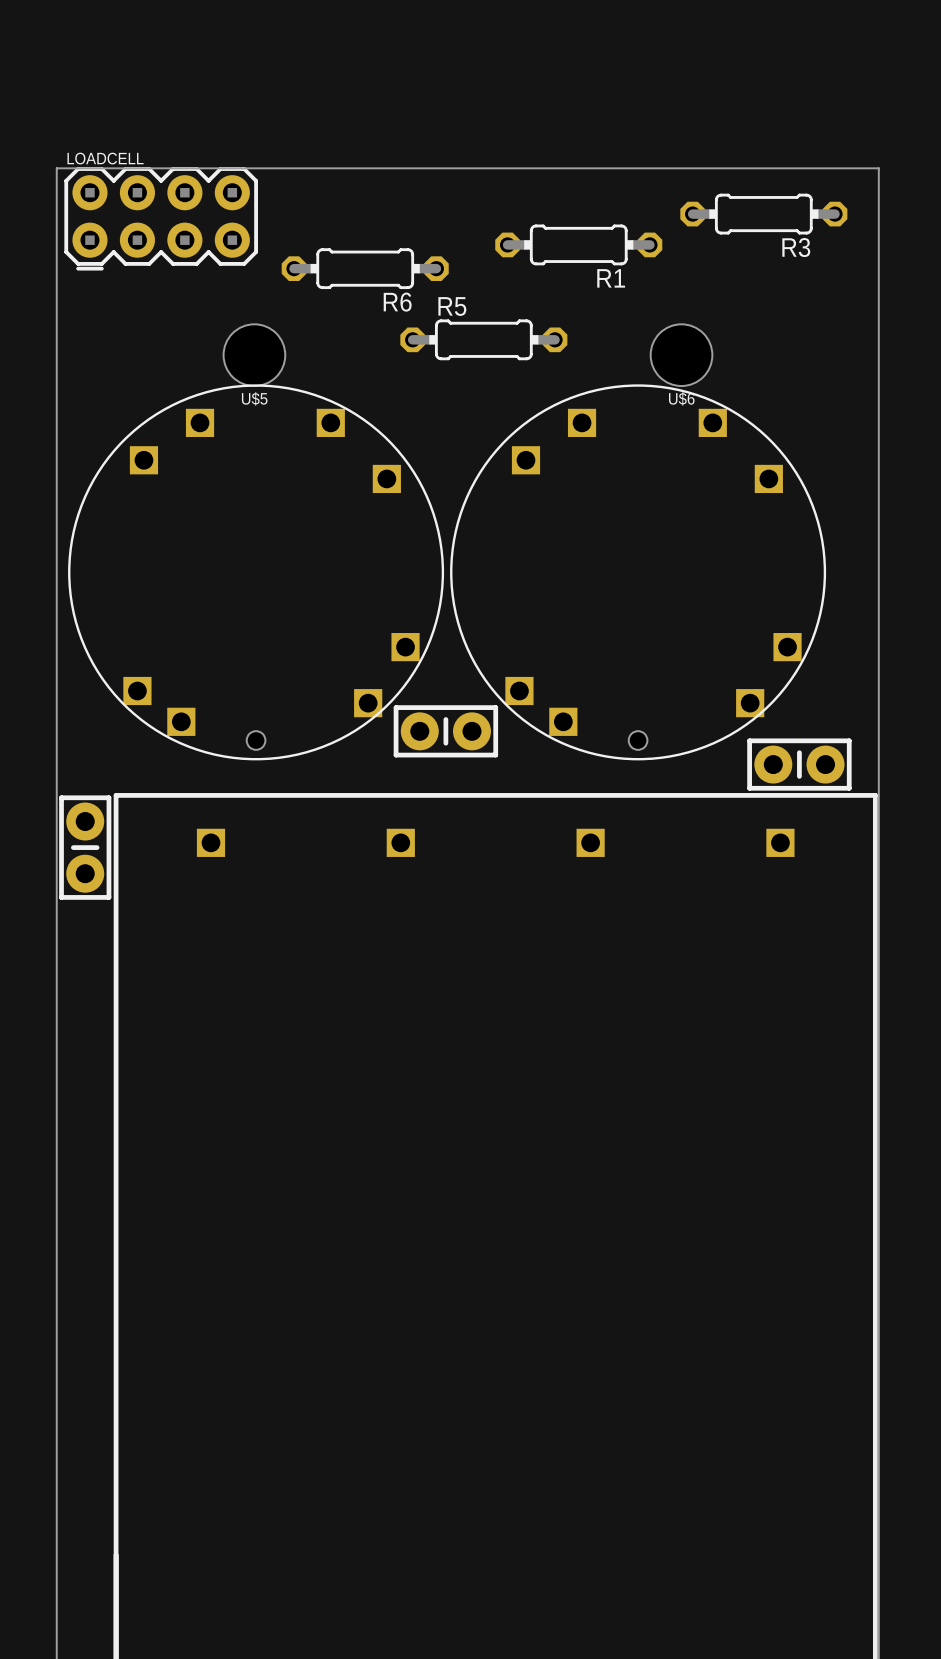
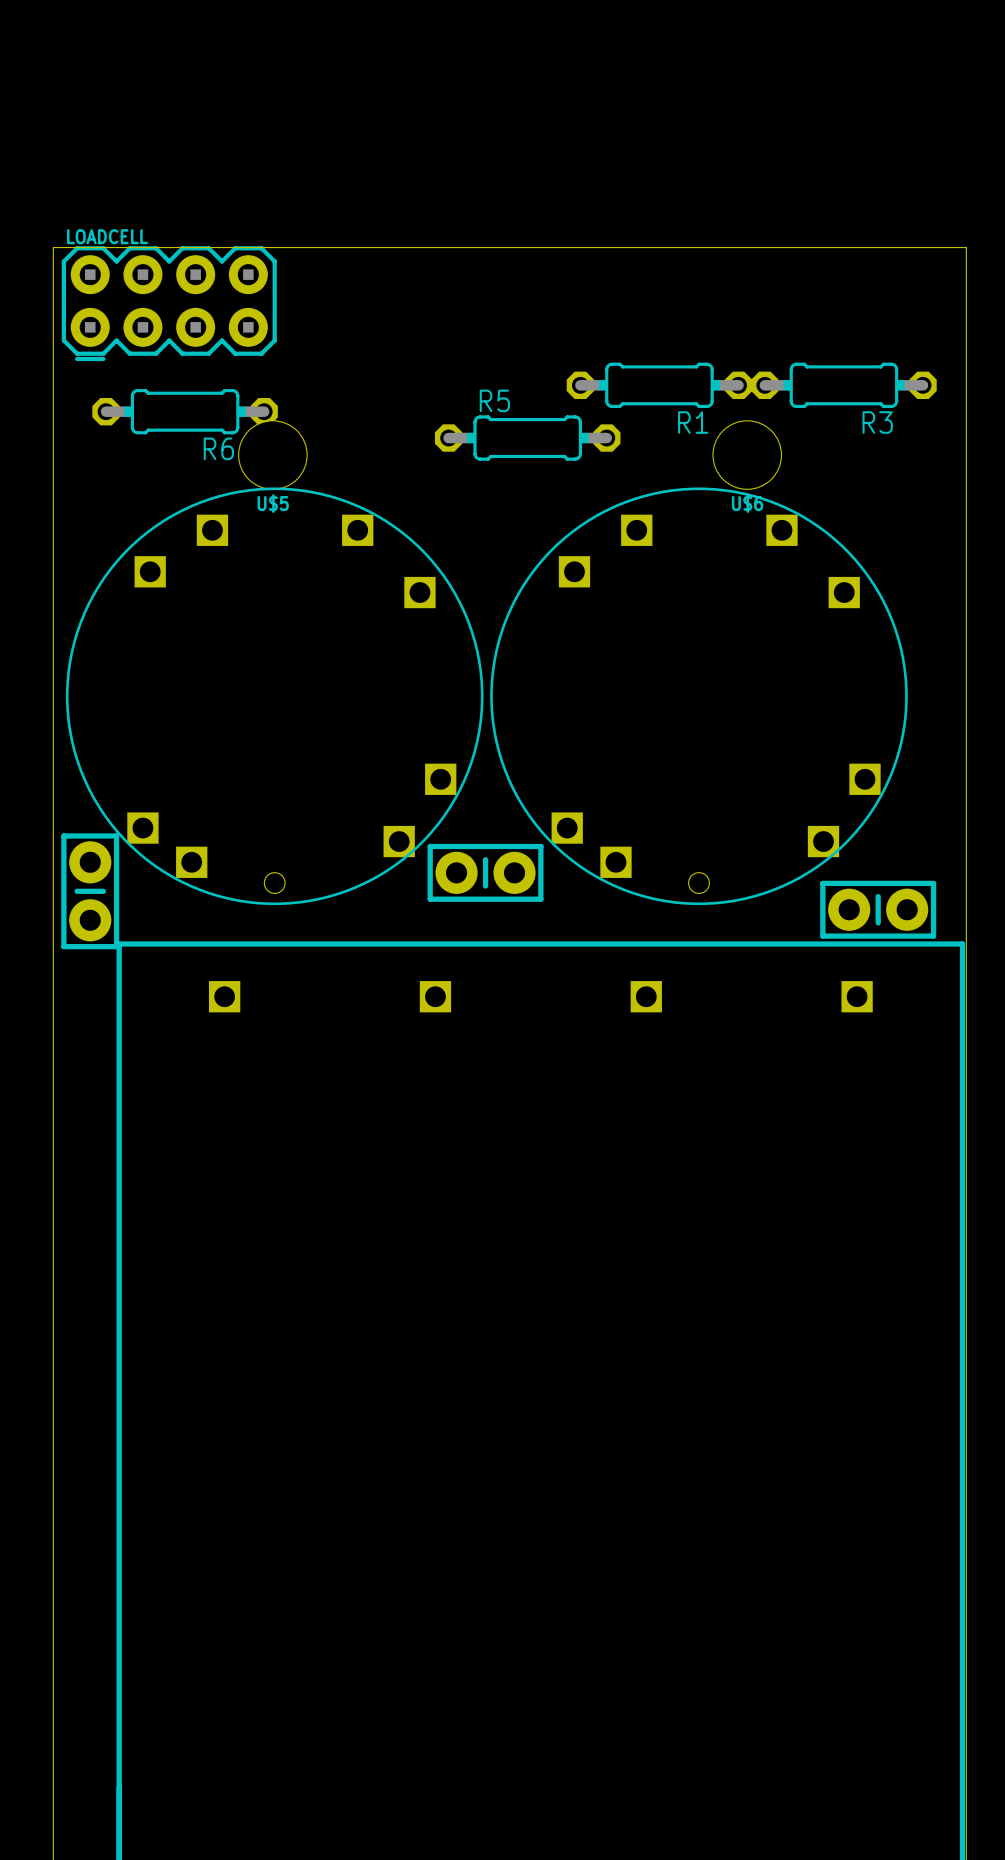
R3 position: (763, 214) -> (843, 385)
R1 position: (578, 244) -> (659, 385)
R6 position: (365, 268) -> (185, 411)
part position: (85, 847) -> (90, 891)

